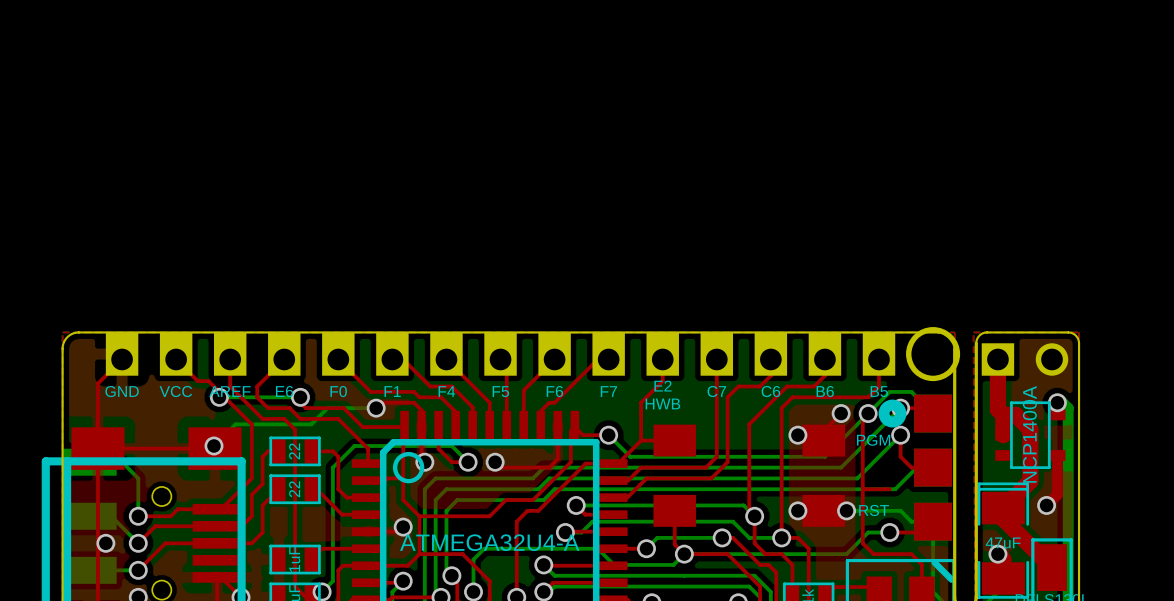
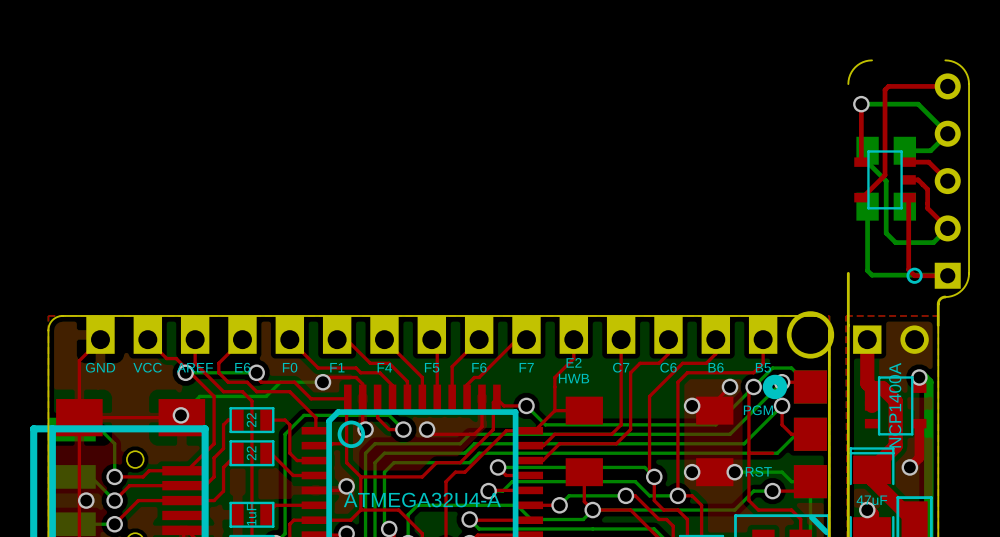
board edge: none -> (872, 60) (862, 62) (855, 67) (850, 74) (848, 84)
board edge: none -> (945, 60) (954, 62) (962, 67) (968, 80) (969, 273) (967, 282) (962, 290) (939, 300) (938, 325)
top track: none -> (947, 86) (888, 86) (885, 89) (885, 175) (861, 197)
bottom track: none -> (861, 104) (918, 104) (947, 133) (930, 150) (904, 150)
top track: none -> (861, 104) (861, 162)
via: none -> (861, 104)
bottom track: none -> (867, 150) (867, 162) (886, 181) (886, 233) (895, 242) (933, 242) (947, 228)
top track: none -> (908, 162) (928, 162) (947, 181)
part: none -> (886, 178)
part: none -> (885, 179)
top track: none -> (908, 179) (918, 179) (927, 189) (927, 208) (947, 228)
part: none -> (933, 181)
top track: none -> (908, 197) (908, 269) (914, 275) (947, 275)
bottom track: none -> (867, 206) (867, 270) (872, 275) (947, 275)
board edge: (976, 343) (979, 335) (987, 332) (1069, 332) (1076, 336) (1079, 343) -> (848, 325) (848, 273)

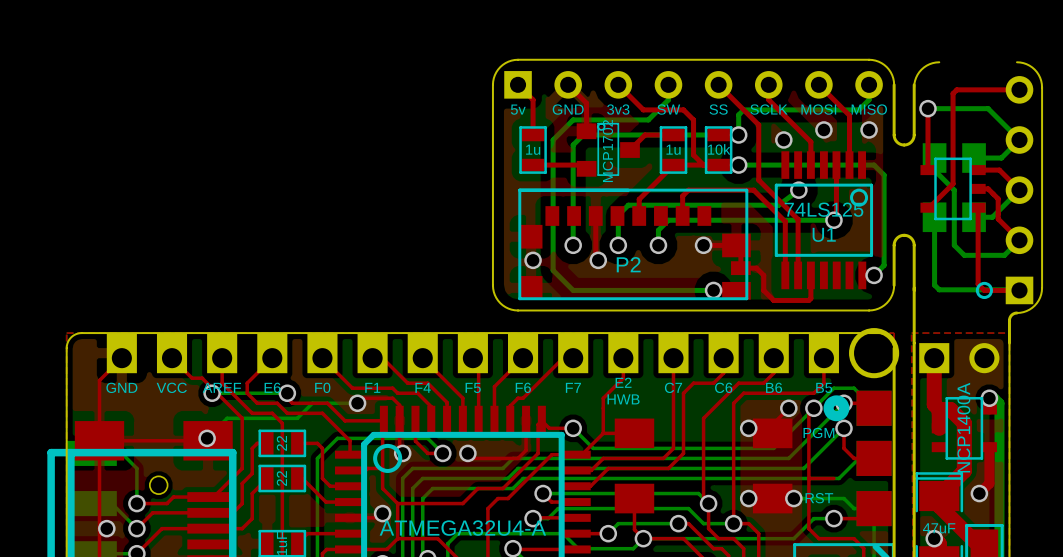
top track: none -> (518, 84) (533, 99) (533, 134)
top track: none -> (568, 84) (586, 103) (586, 131)
top track: none -> (618, 84) (643, 109) (683, 109) (693, 119) (693, 155) (703, 165)
bottom track: none -> (668, 84) (668, 99) (648, 119) (573, 119) (553, 140) (553, 270) (573, 290) (713, 290)
part: none -> (693, 84)
top track: none -> (718, 84) (758, 124) (758, 180) (798, 219) (798, 275)
top track: none -> (768, 84) (768, 99) (810, 142) (810, 165)
top track: none -> (818, 84) (849, 115) (849, 165)
bottom track: none -> (869, 84) (869, 99) (859, 109) (743, 109) (738, 114) (738, 134) (583, 134) (573, 145) (573, 245)
board edge: none -> (914, 84) (914, 136) (911, 142) (904, 145) (897, 142) (894, 136) (894, 84) (892, 75) (884, 64) (872, 59) (518, 59) (508, 61) (500, 67) (494, 75) (492, 84) (493, 288) (498, 300) (508, 308) (518, 310) (872, 310) (884, 305) (892, 295) (894, 242) (898, 237) (904, 235) (911, 238) (914, 244) (914, 287)
text: none -> GND (568, 109)
text: none -> 3v3 (618, 109)
text: none -> SW (668, 109)
text: none -> SS (718, 109)
text: none -> SCLK (769, 109)
text: none -> MOSI (818, 109)
text: none -> MISO (869, 109)
text: none -> 5v (518, 109)
via: none -> (823, 129)
via: none -> (869, 129)
top track: none -> (673, 134) (645, 134) (630, 150)
via: none -> (738, 134)
via: none -> (783, 140)
part: none -> 1u (533, 150)
part: none -> MCP1702 (608, 149)
part: none -> 1u (673, 150)
part: none -> 10k (718, 150)
top track: none -> (836, 155) (836, 217) (833, 220)
top track: none -> (533, 165) (582, 165) (586, 168)
bottom track: none -> (738, 165) (874, 165) (884, 175) (884, 265) (874, 275)
top track: none -> (738, 165) (673, 165) (639, 199) (639, 216)
via: none -> (738, 165)
bottom track: none -> (798, 190) (778, 205) (628, 205) (618, 215) (618, 245)
via: none -> (798, 190)
bottom track: none -> (1019, 190) (992, 217) (974, 217)
top track: none -> (595, 216) (595, 257) (598, 260)
top track: none -> (682, 216) (682, 196) (688, 190) (753, 190) (785, 221) (785, 275)
U1: none -> 74LS125 (823, 220)
bottom track: none -> (833, 220) (668, 220) (658, 230) (658, 245)
via: none -> (833, 220)
P2: none -> (634, 244)
via: none -> (573, 245)
via: none -> (618, 245)
via: none -> (658, 245)
top track: none -> (703, 245) (736, 245) (740, 249) (740, 268) (756, 268) (763, 275) (763, 290) (773, 300) (808, 300) (810, 298) (810, 275)
via: none -> (703, 245)
via: none -> (533, 260)
via: none -> (598, 260)
via: none -> (874, 275)
via: none -> (713, 290)

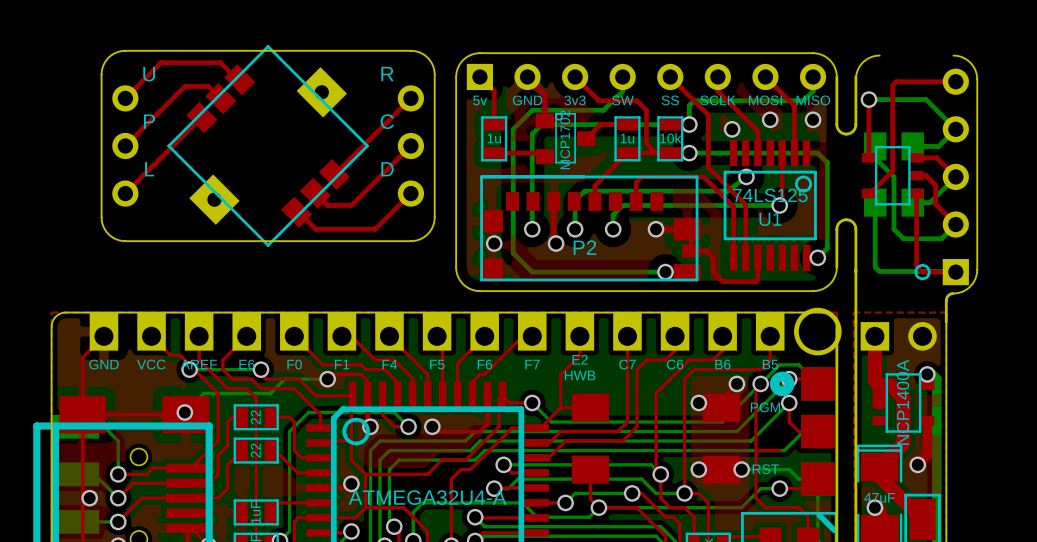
board edge: none -> (125, 50) (410, 50) (422, 53) (431, 62) (434, 71) (434, 217) (432, 226) (427, 234) (420, 239) (410, 241)
board edge: none -> (125, 50) (110, 55) (104, 62) (101, 71) (101, 217)
text: none -> U (149, 74)
text: none -> R (387, 74)
top track: none -> (239, 79) (220, 62) (161, 62) (125, 98)
top track: none -> (220, 98) (208, 86) (184, 86) (125, 145)
top track: none -> (410, 98) (334, 174)
top track: none -> (201, 117) (125, 193)
text: none -> P (149, 121)
text: none -> C (387, 121)
part: none -> (125, 145)
part: none -> (268, 145)
top track: none -> (410, 145) (351, 205) (327, 205) (315, 193)
part: none -> (410, 145)
text: none -> L (149, 169)
text: none -> D (387, 169)
top track: none -> (410, 193) (375, 229) (315, 229) (296, 212)
board edge: none -> (101, 217) (106, 231) (113, 237) (122, 240) (410, 241)

